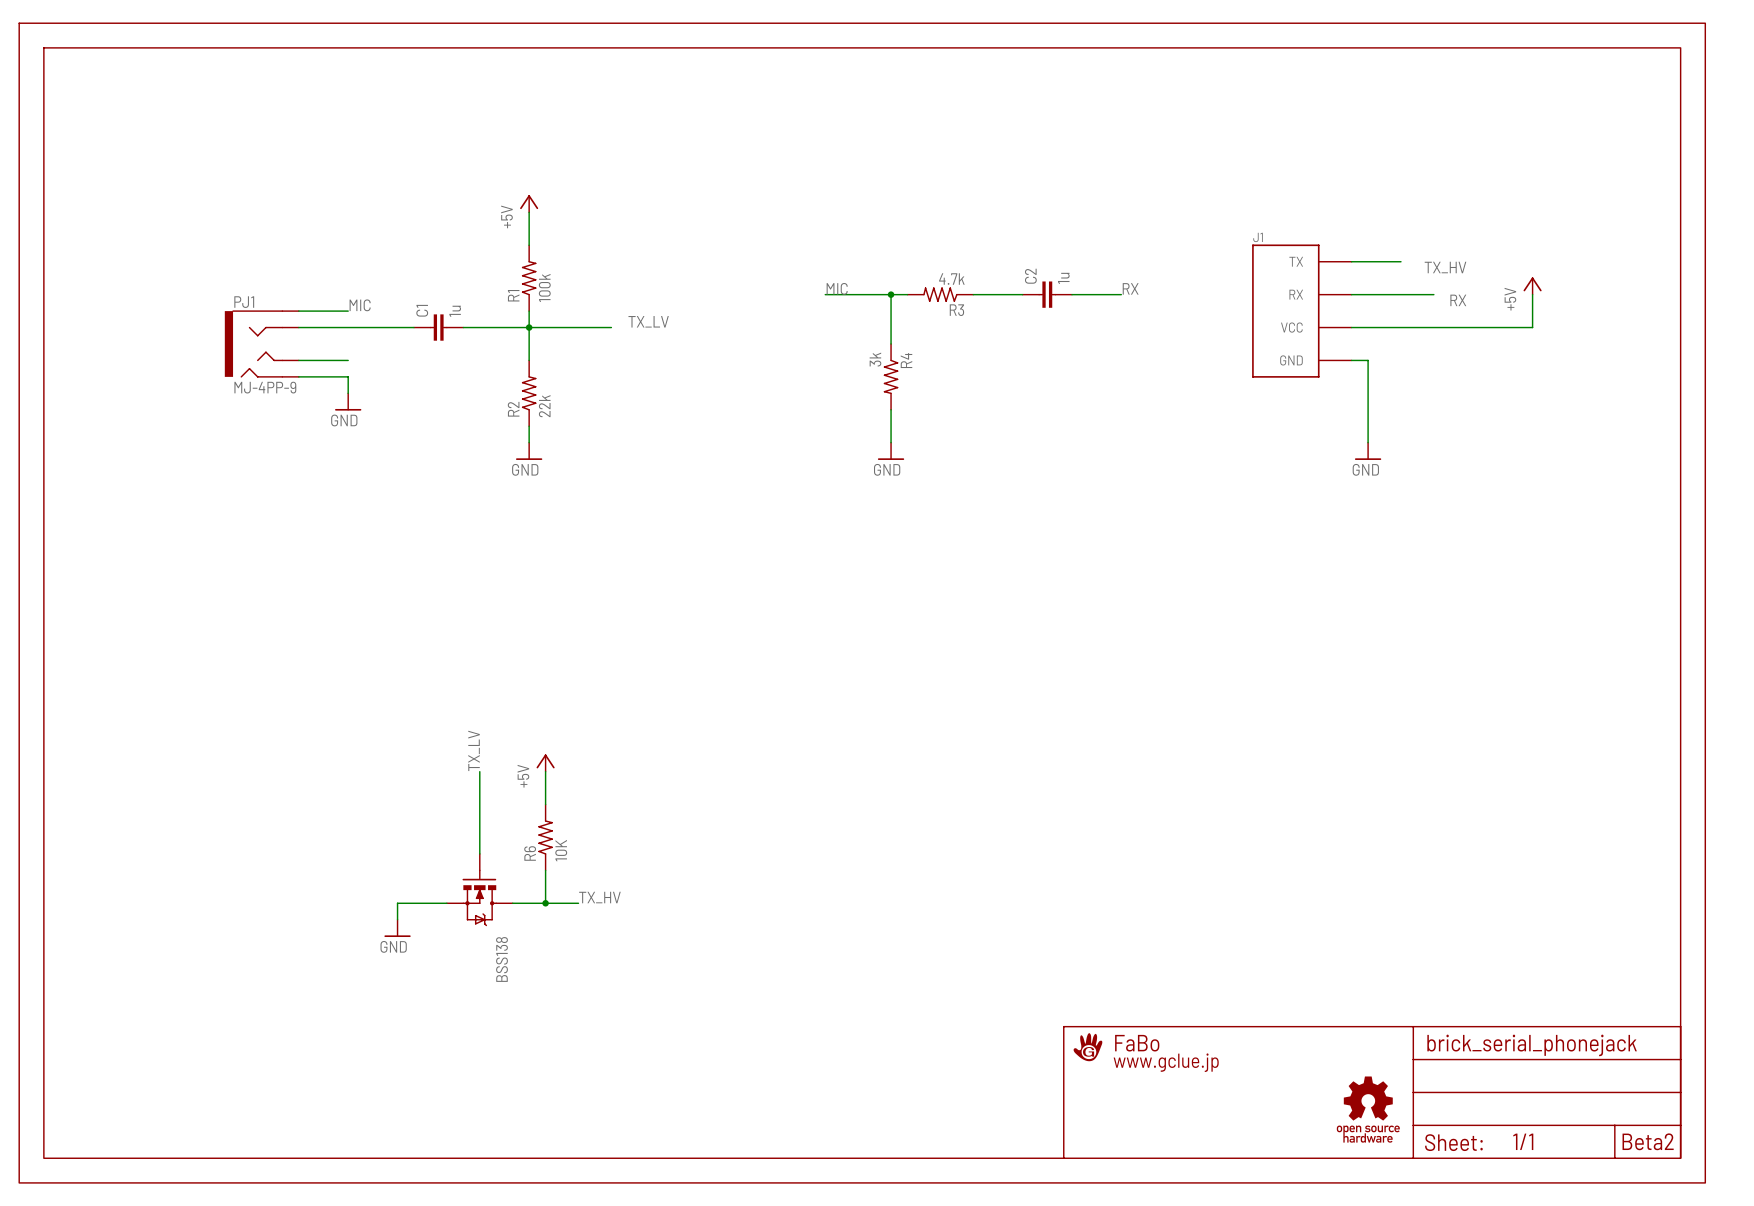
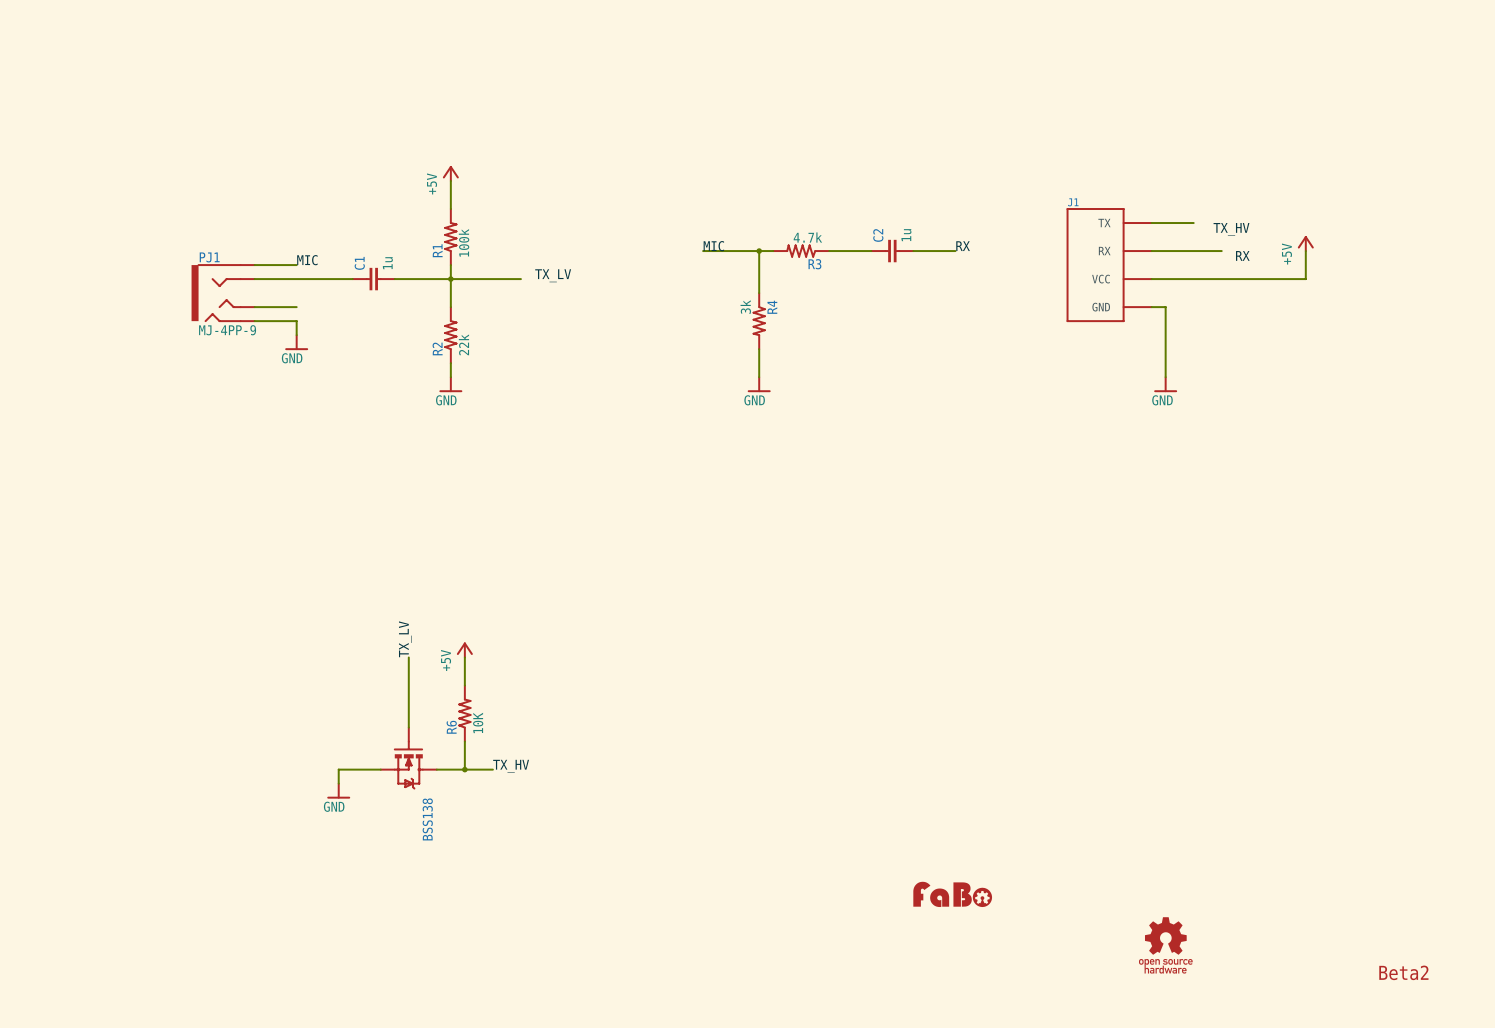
part: (862, 603) -> none
part: none -> (952, 894)

